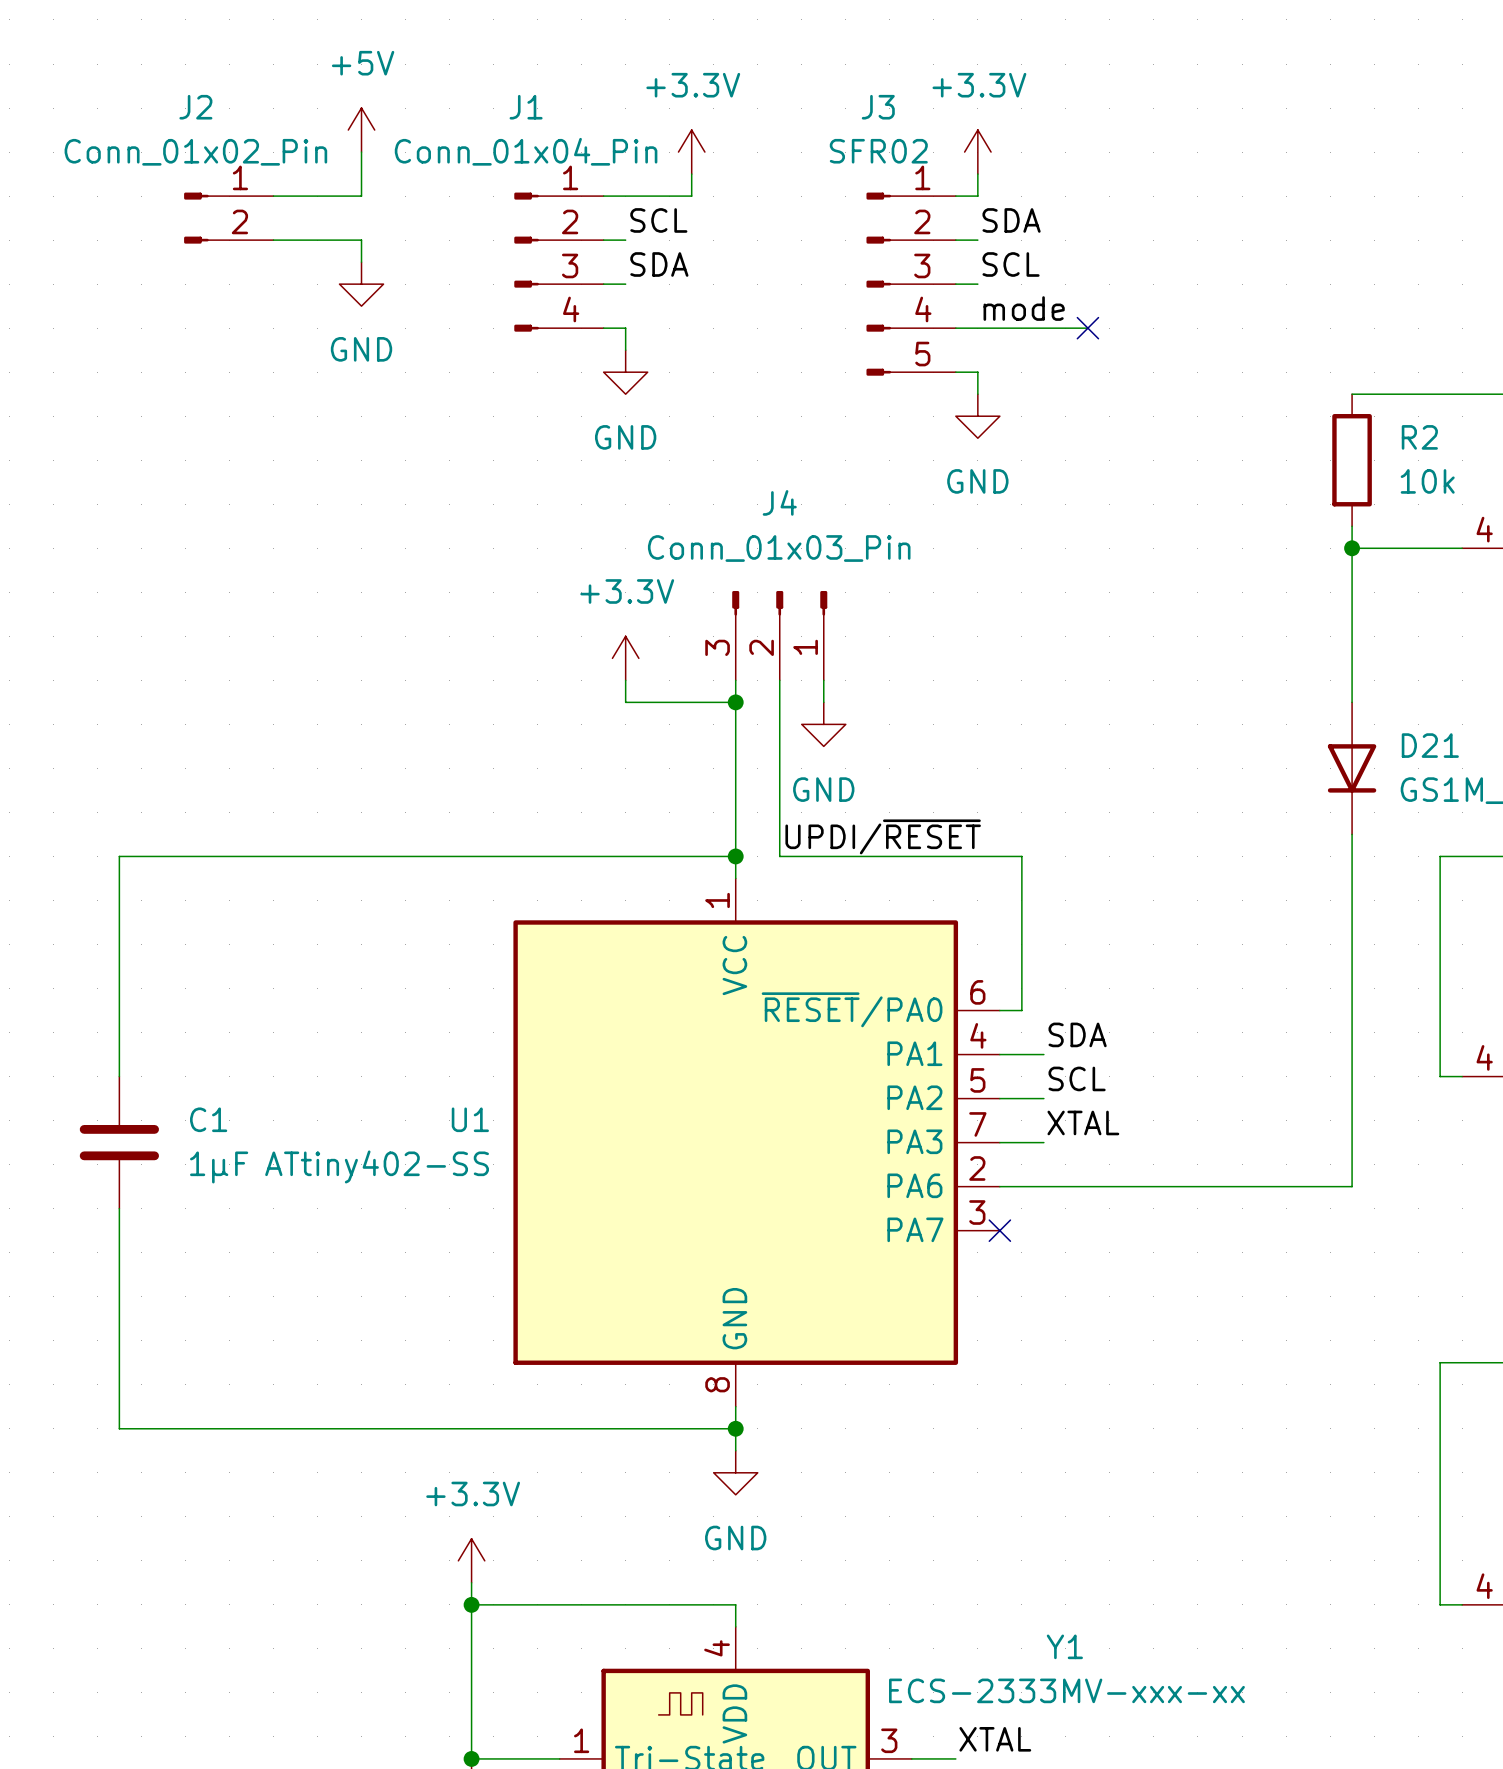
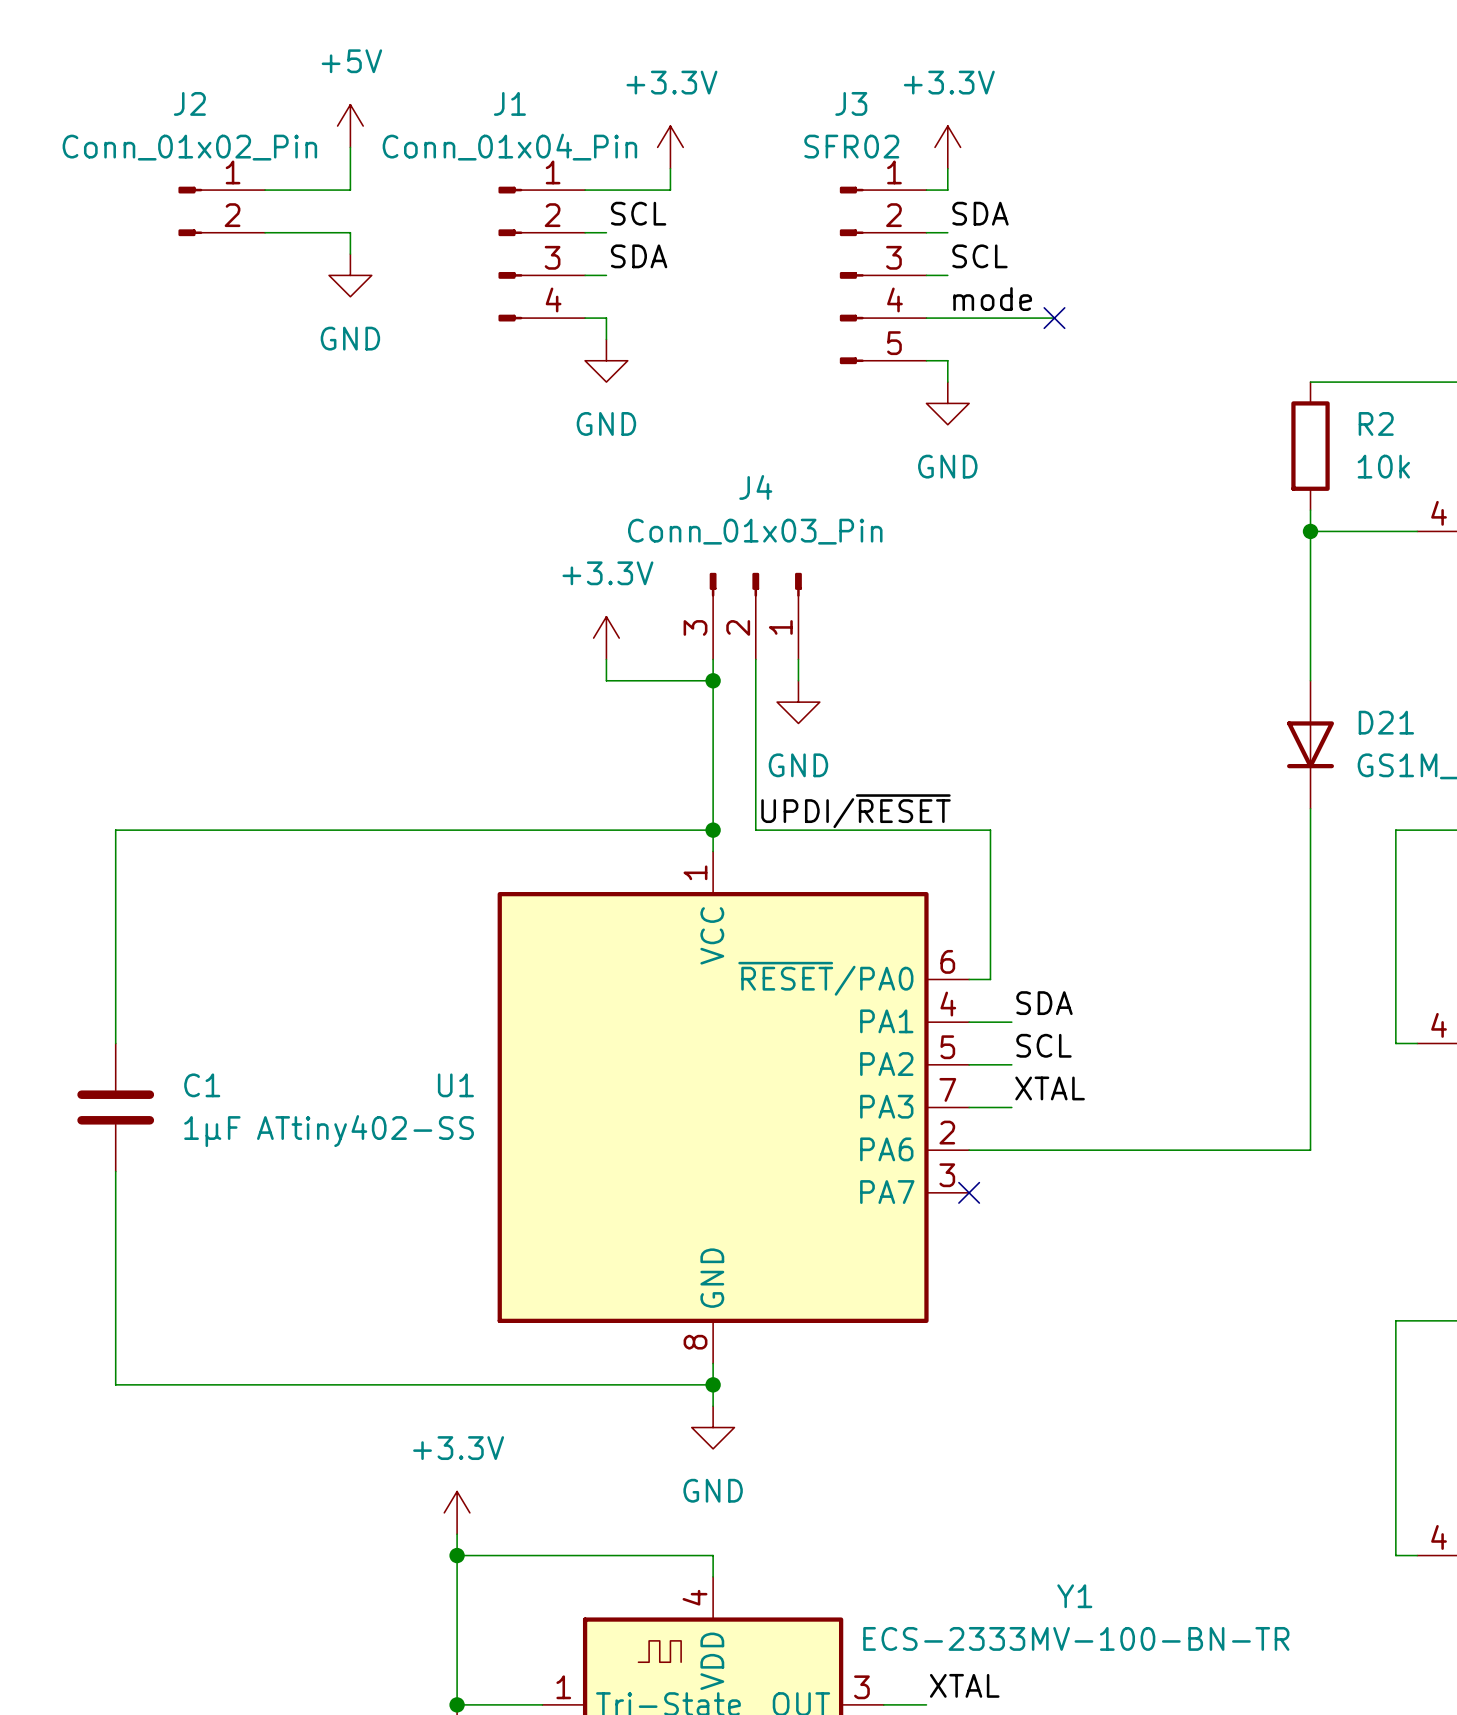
Y1 name position: Y1 (1064, 1646) -> Y1 (1074, 1596)
Y1 value: ECS-2333MV-xxx-xx (1066, 1690) -> ECS-2333MV-100-BN-TR (1076, 1638)

